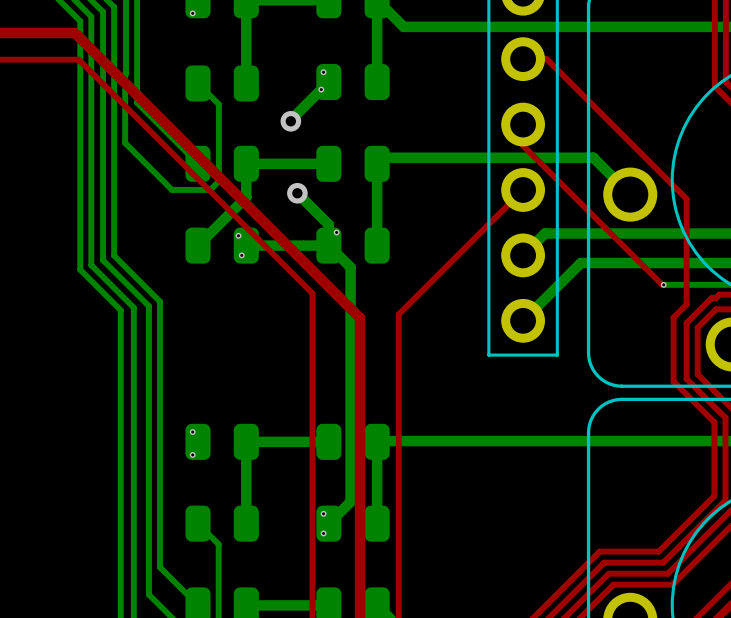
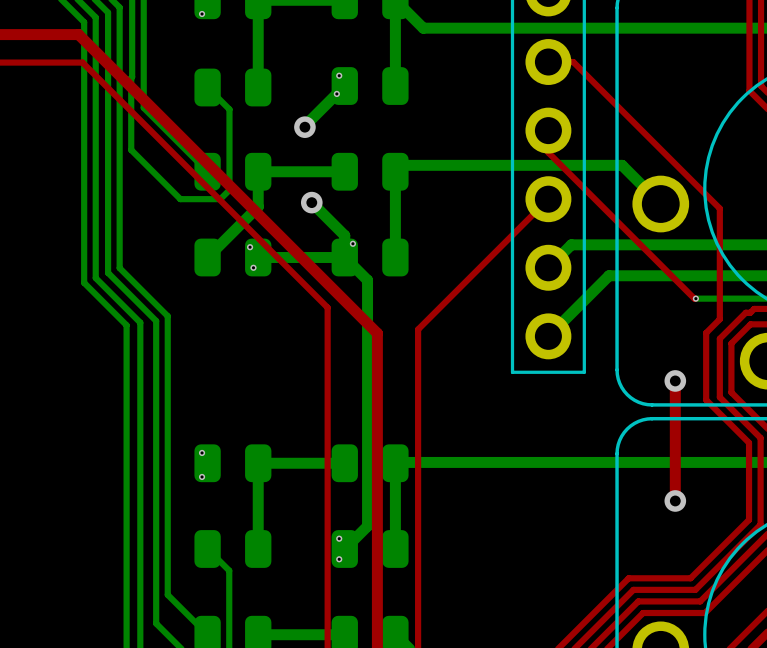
top track: none -> (675, 380) (675, 500)
via: none -> (675, 380)
via: none -> (675, 500)

